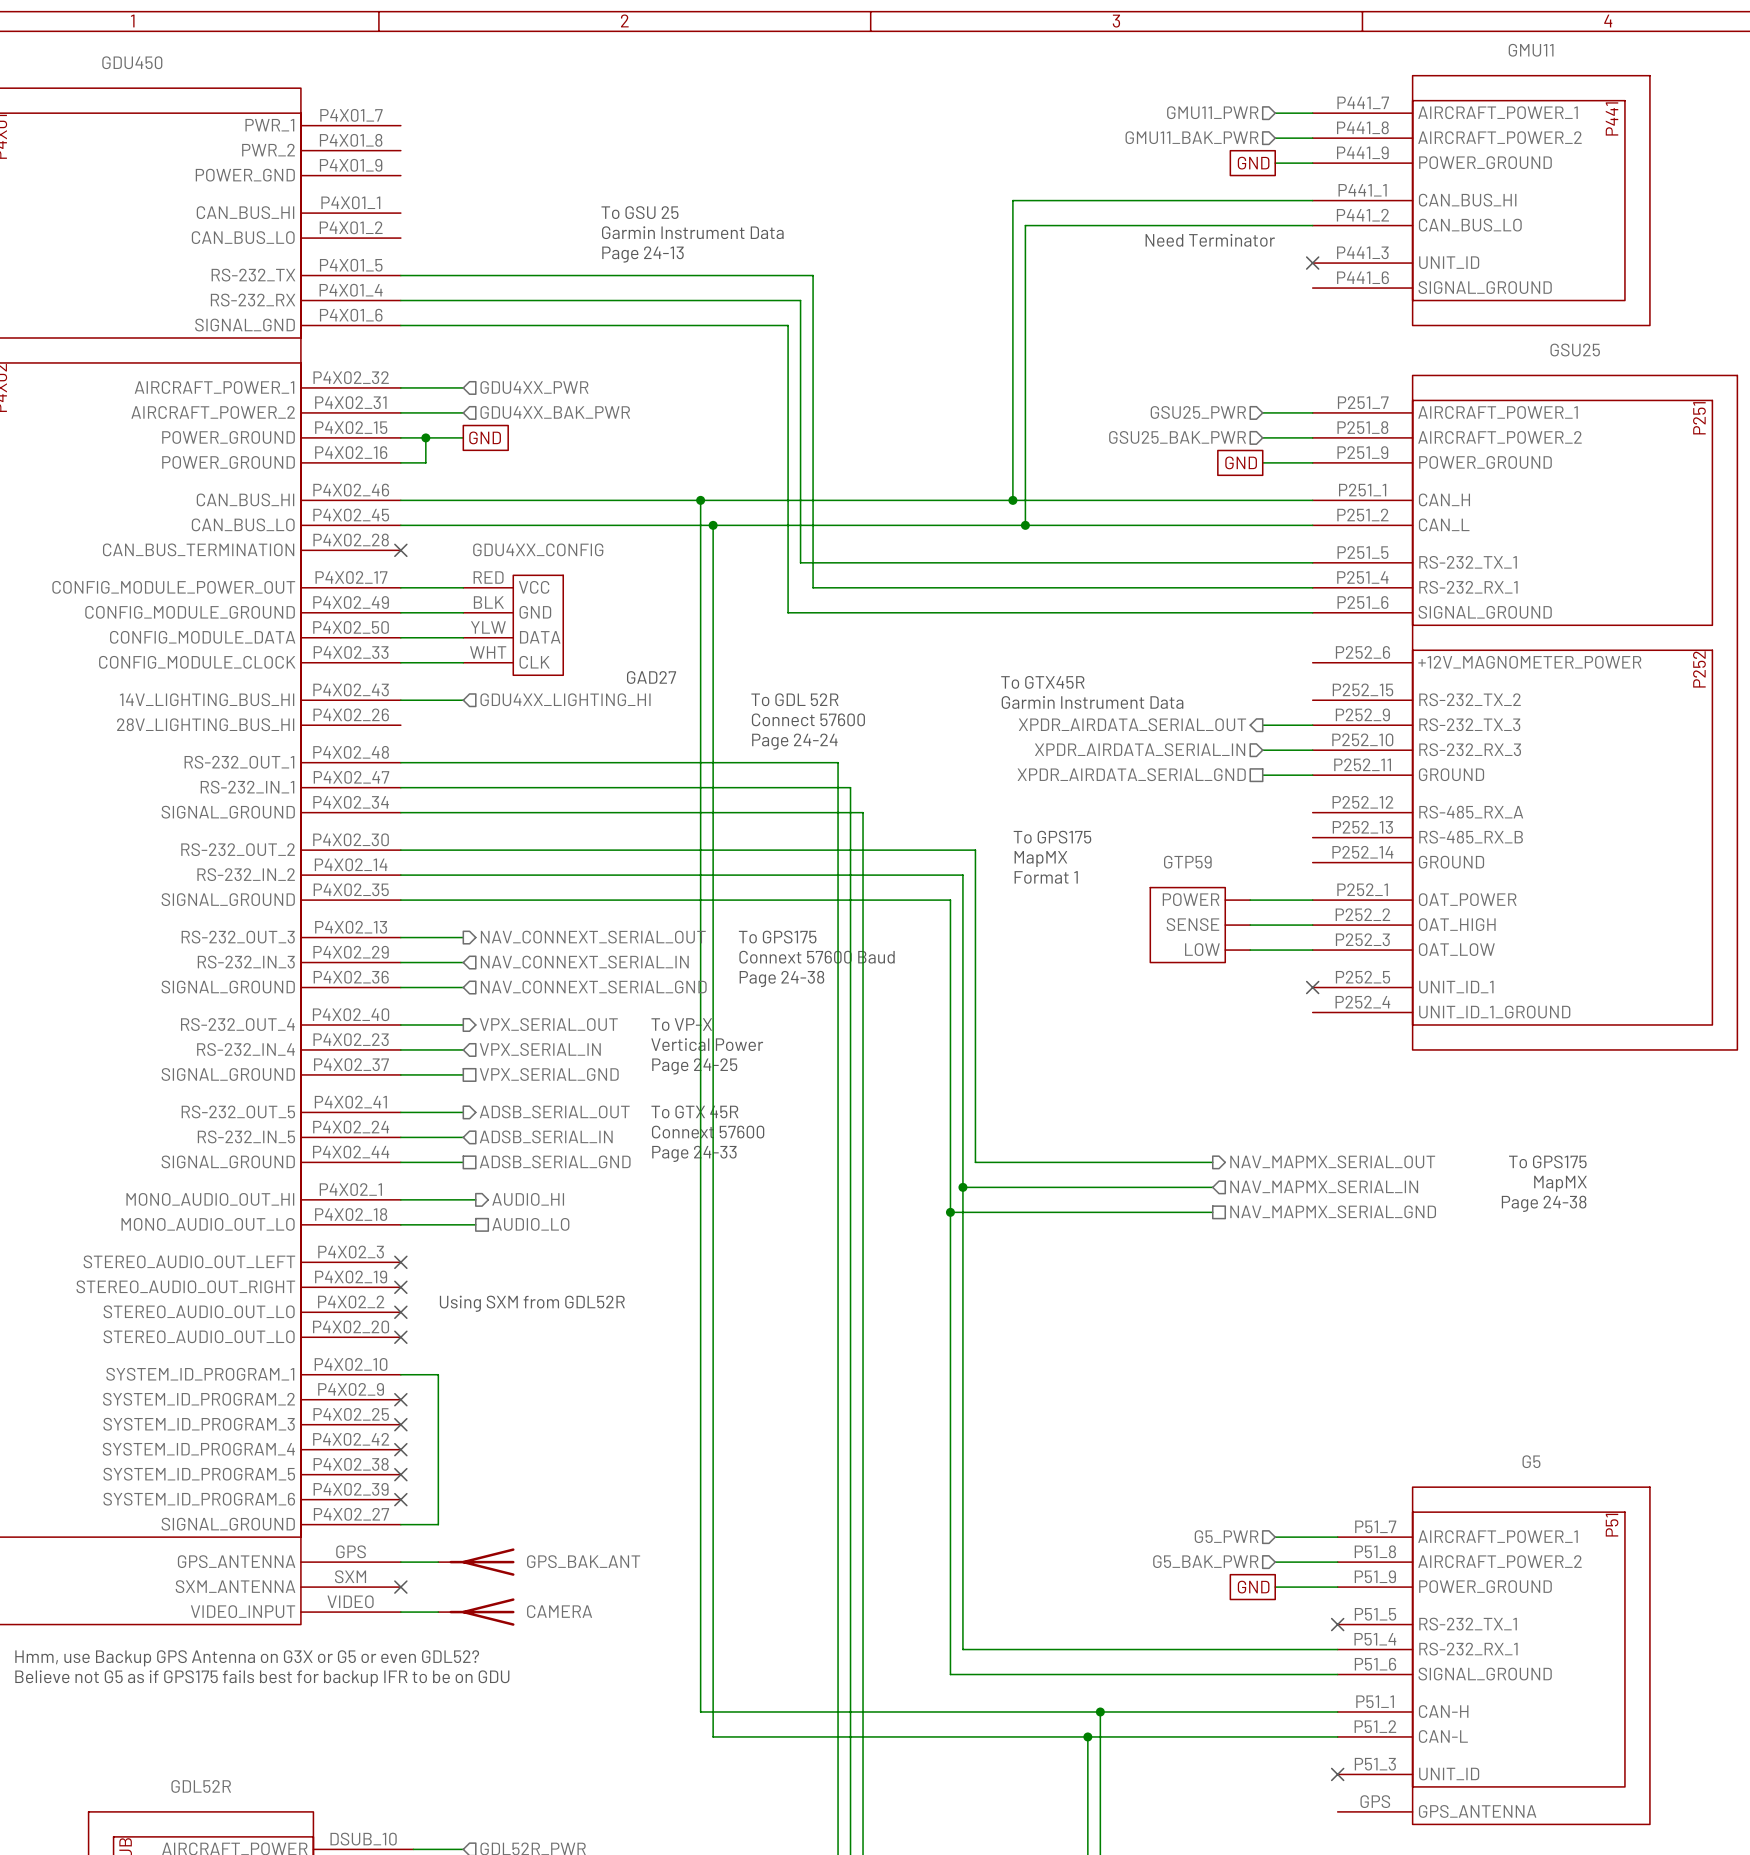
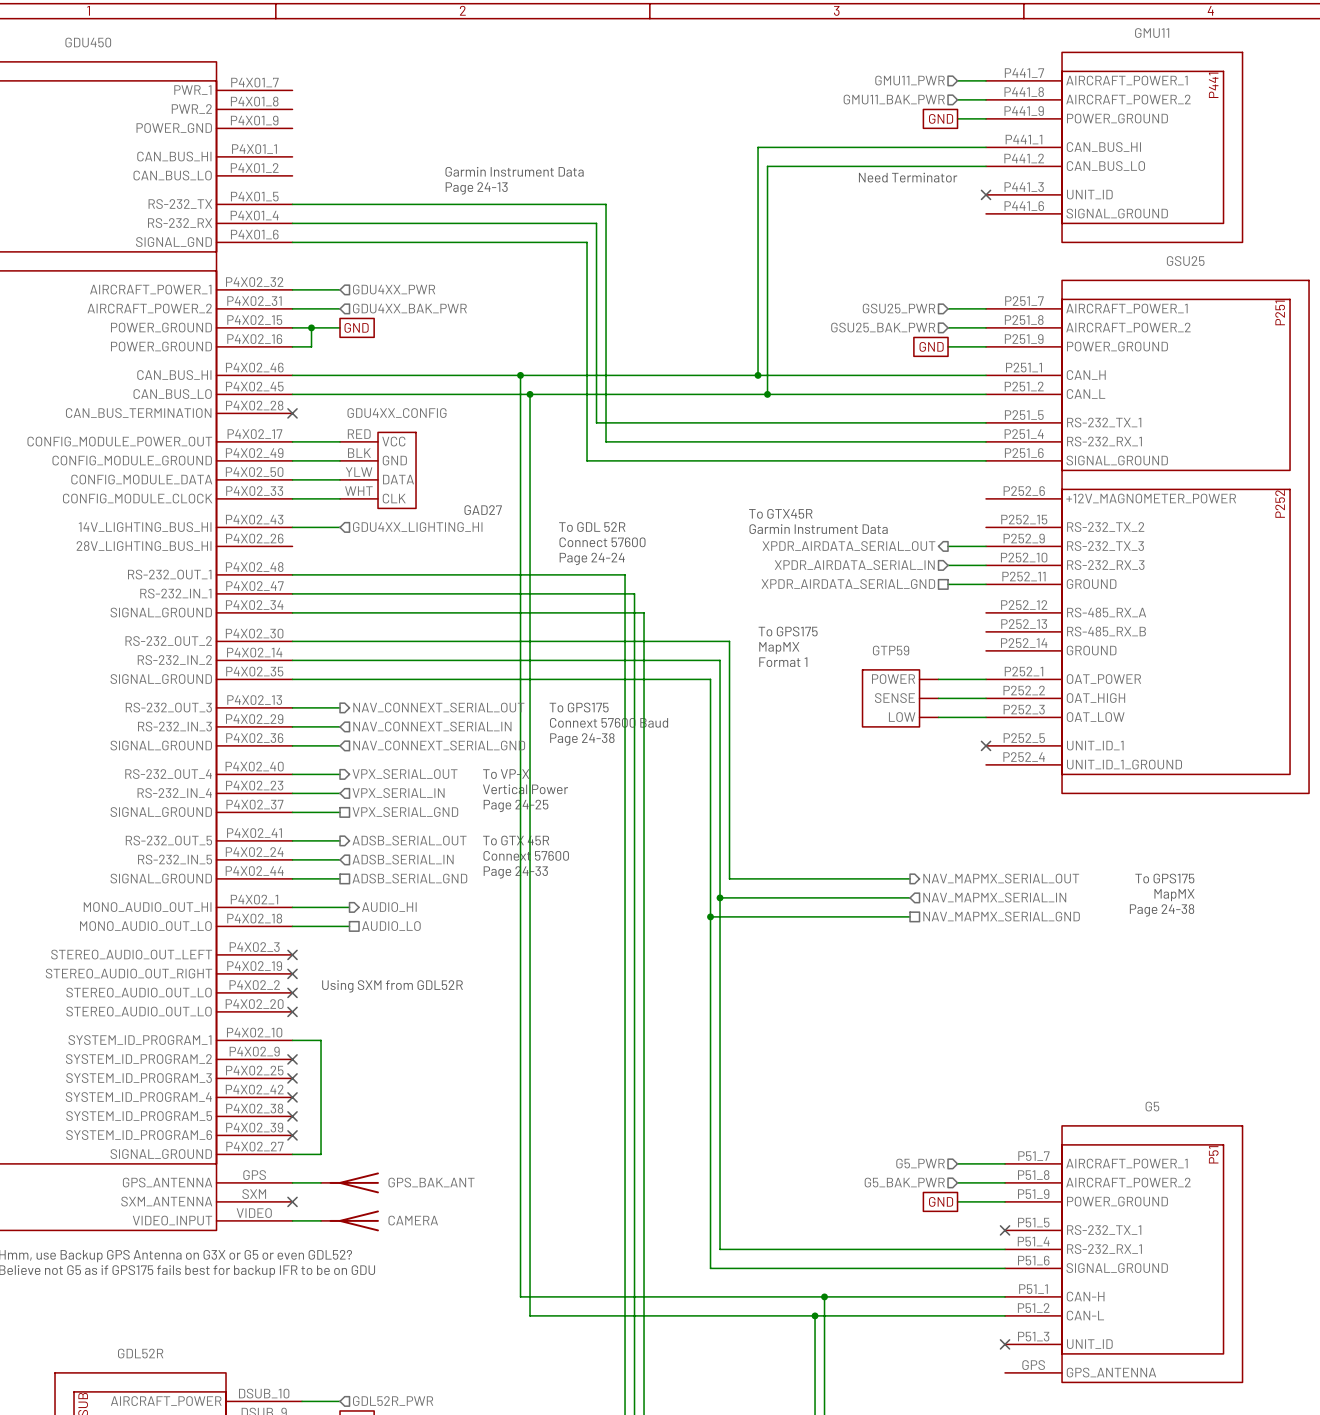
text: To GSU 25 (639, 212) -> none

